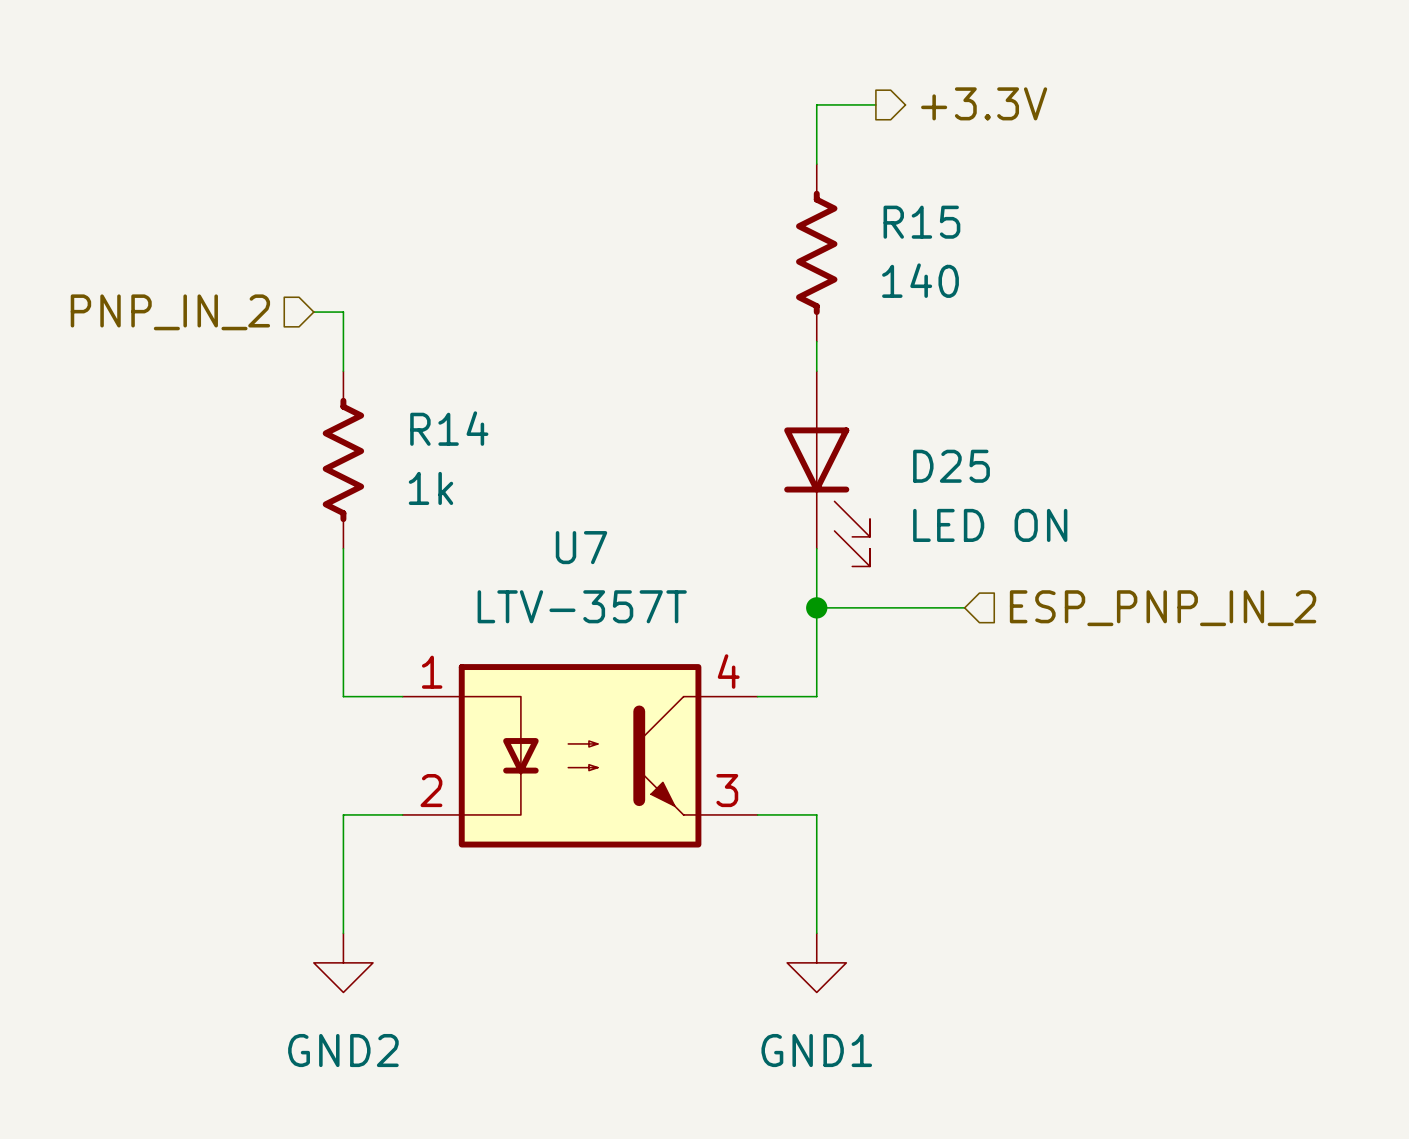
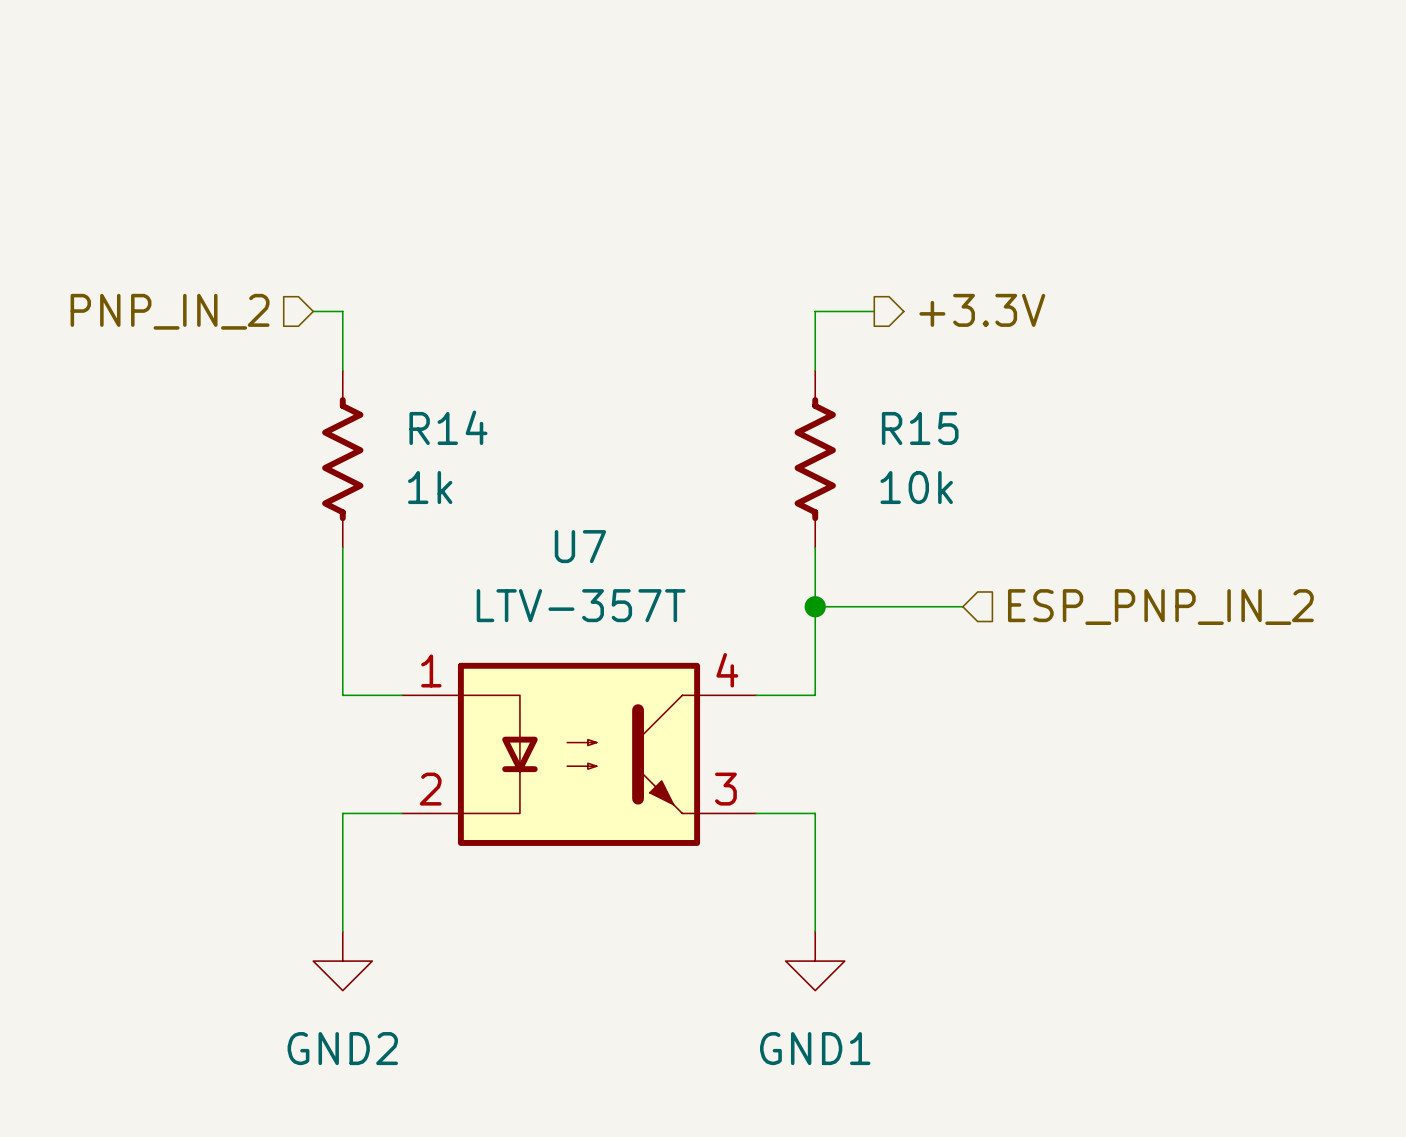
hierarchical label position: +3.3V (984, 103) -> +3.3V (982, 310)
wire: (875, 104) (816, 104) (816, 164) -> none
R15 position: (816, 252) -> (815, 459)
R15 value: 140 (920, 280) -> 10k (916, 487)
wire: none -> (874, 311) (815, 311) (815, 340)
D25: LED ON (827, 468) -> none

